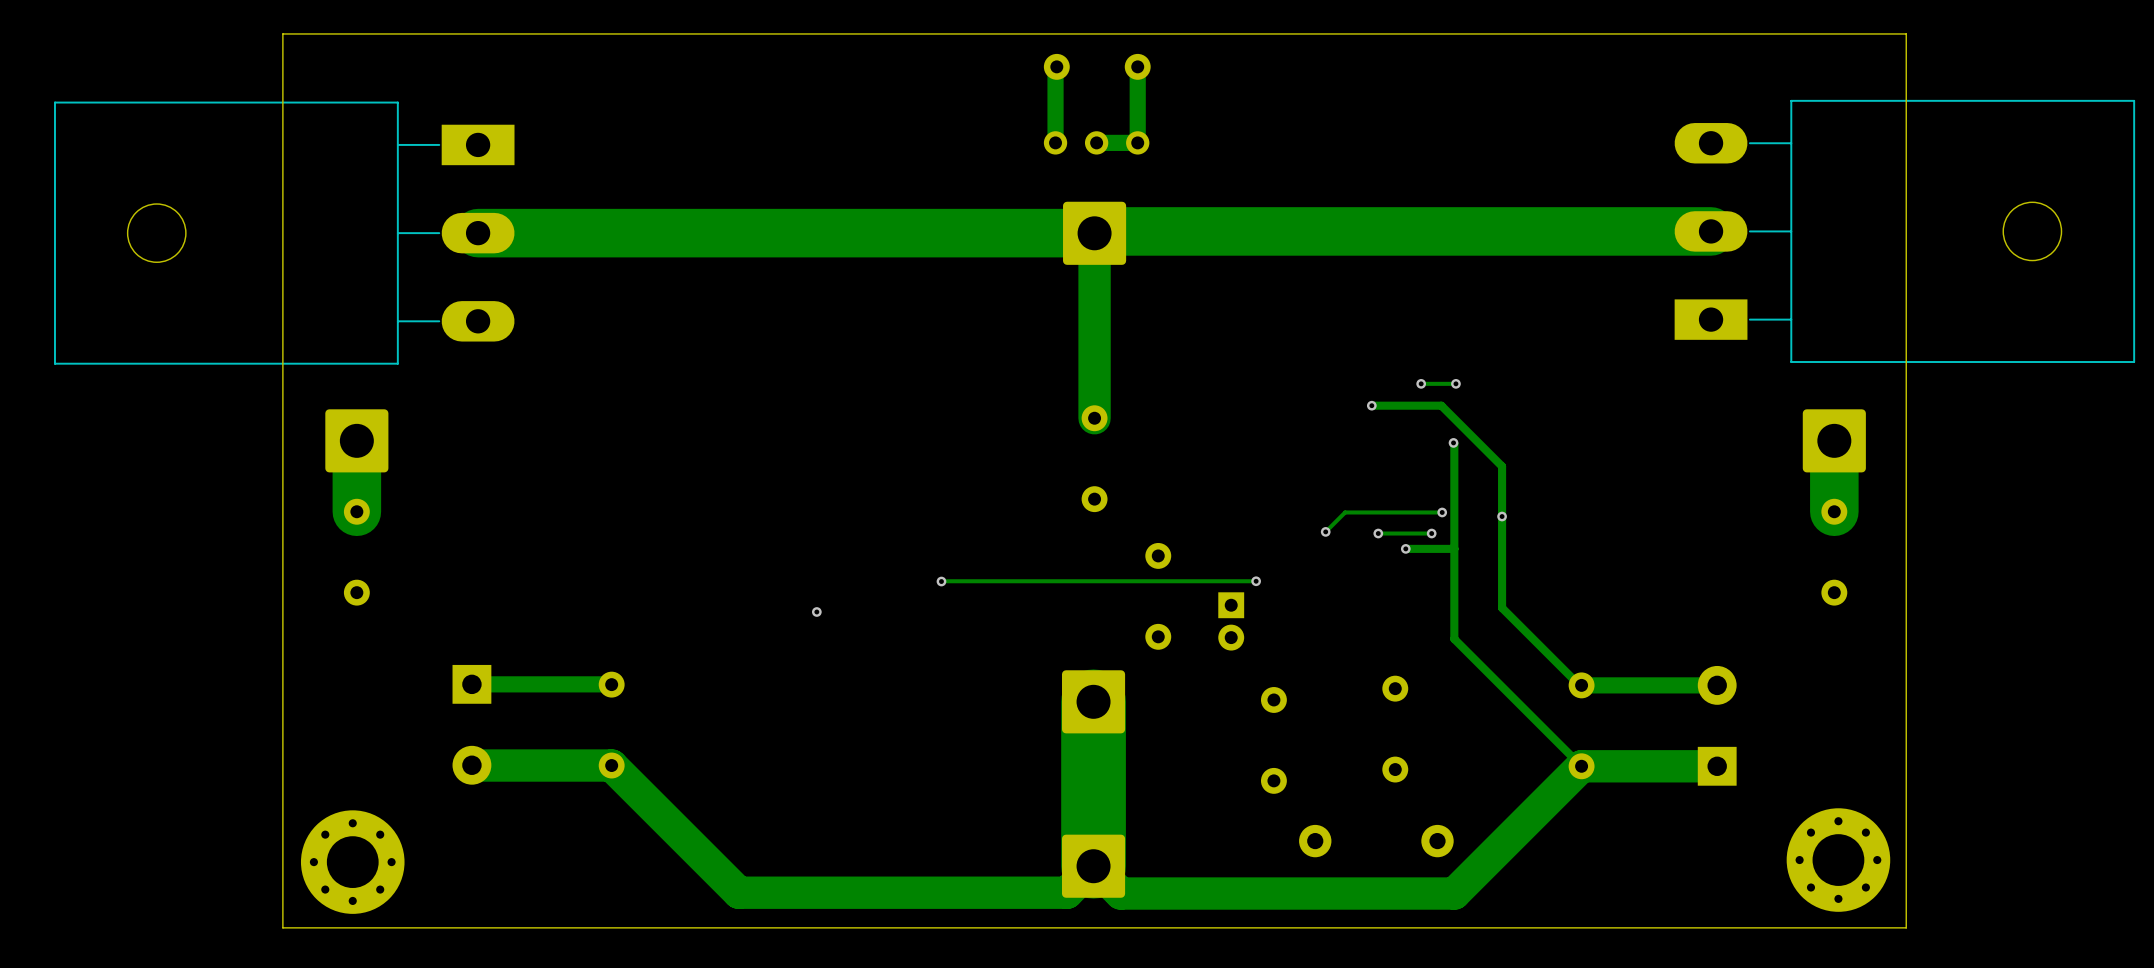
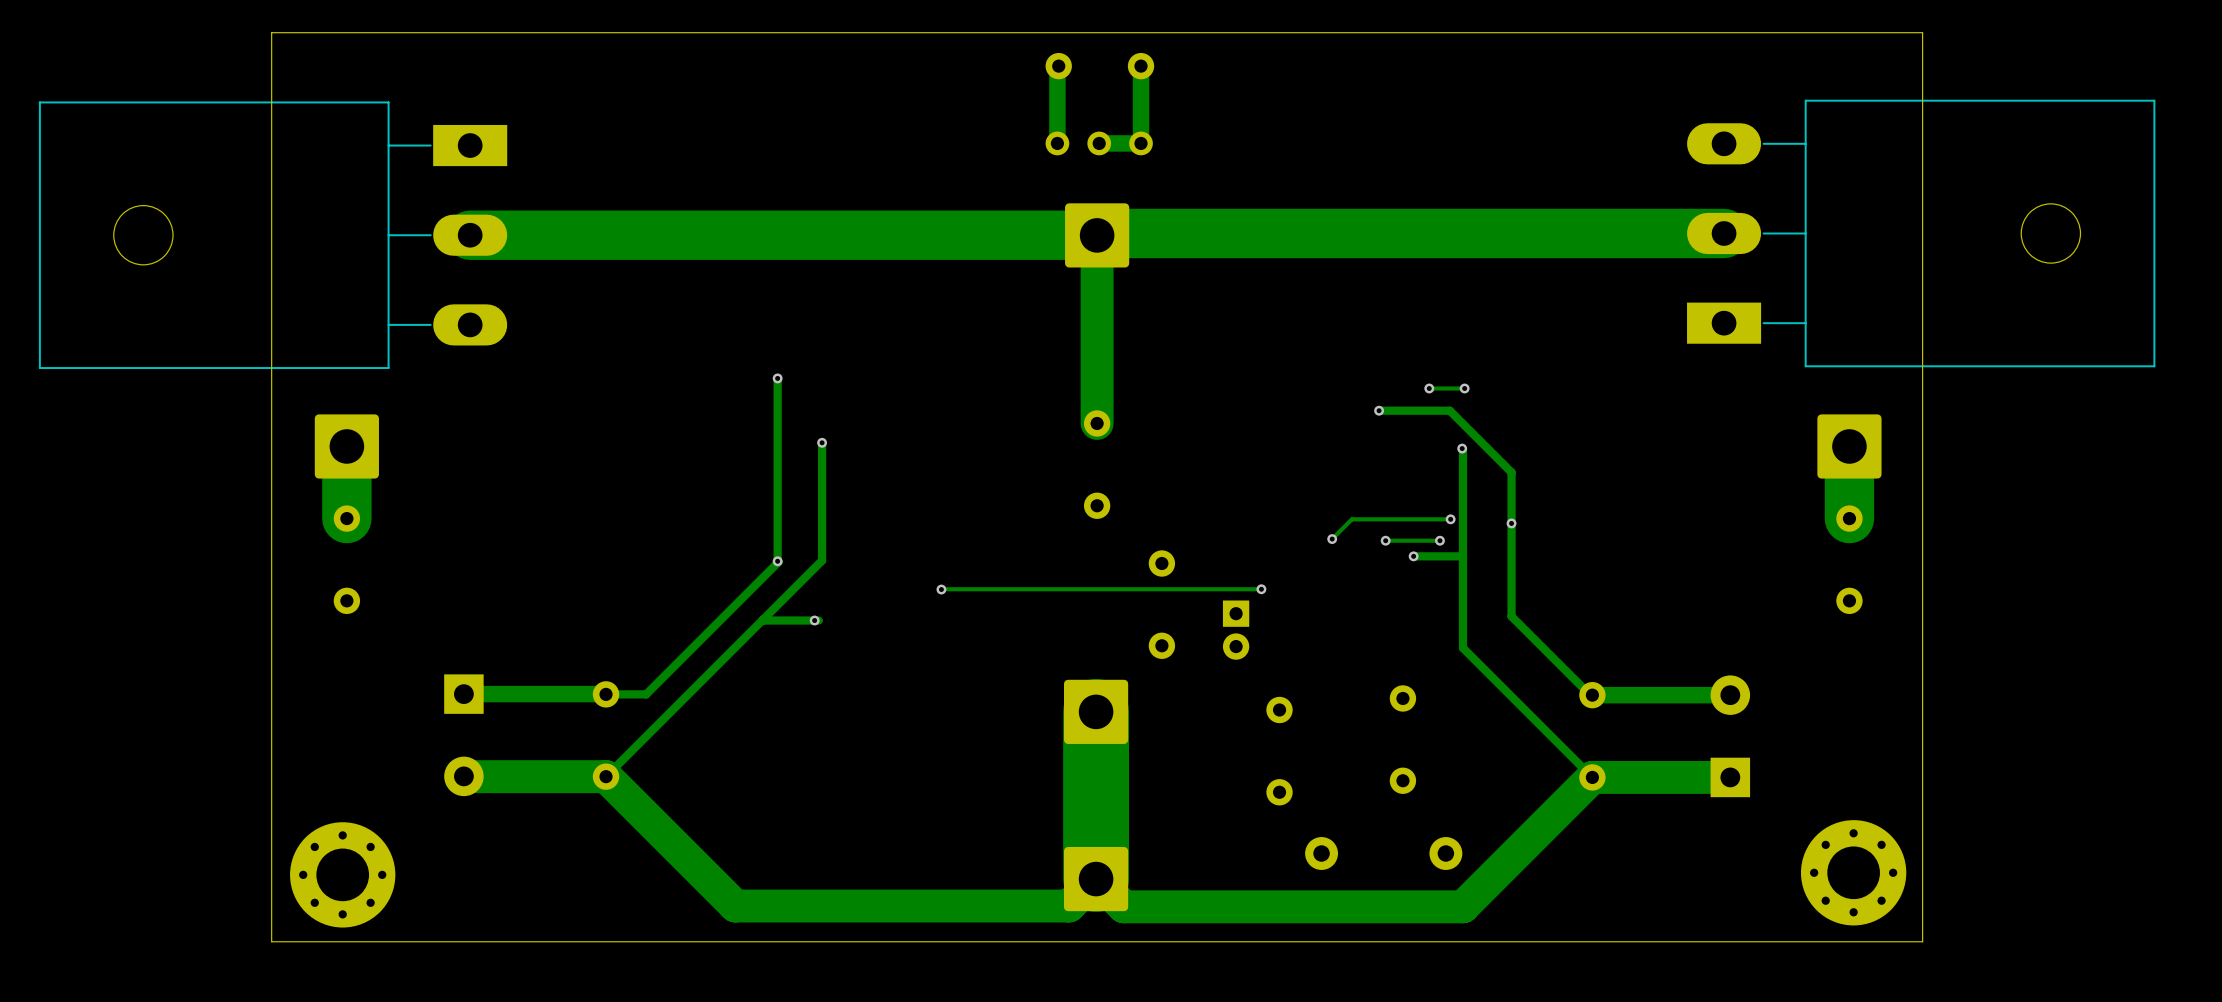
track: none -> (777, 378) (778, 562) (646, 694) (606, 694)
via: none -> (777, 378)
track: none -> (822, 442) (822, 560) (606, 776)
via: none -> (822, 442)
via: none -> (777, 561)
track: none -> (762, 619) (818, 620)

